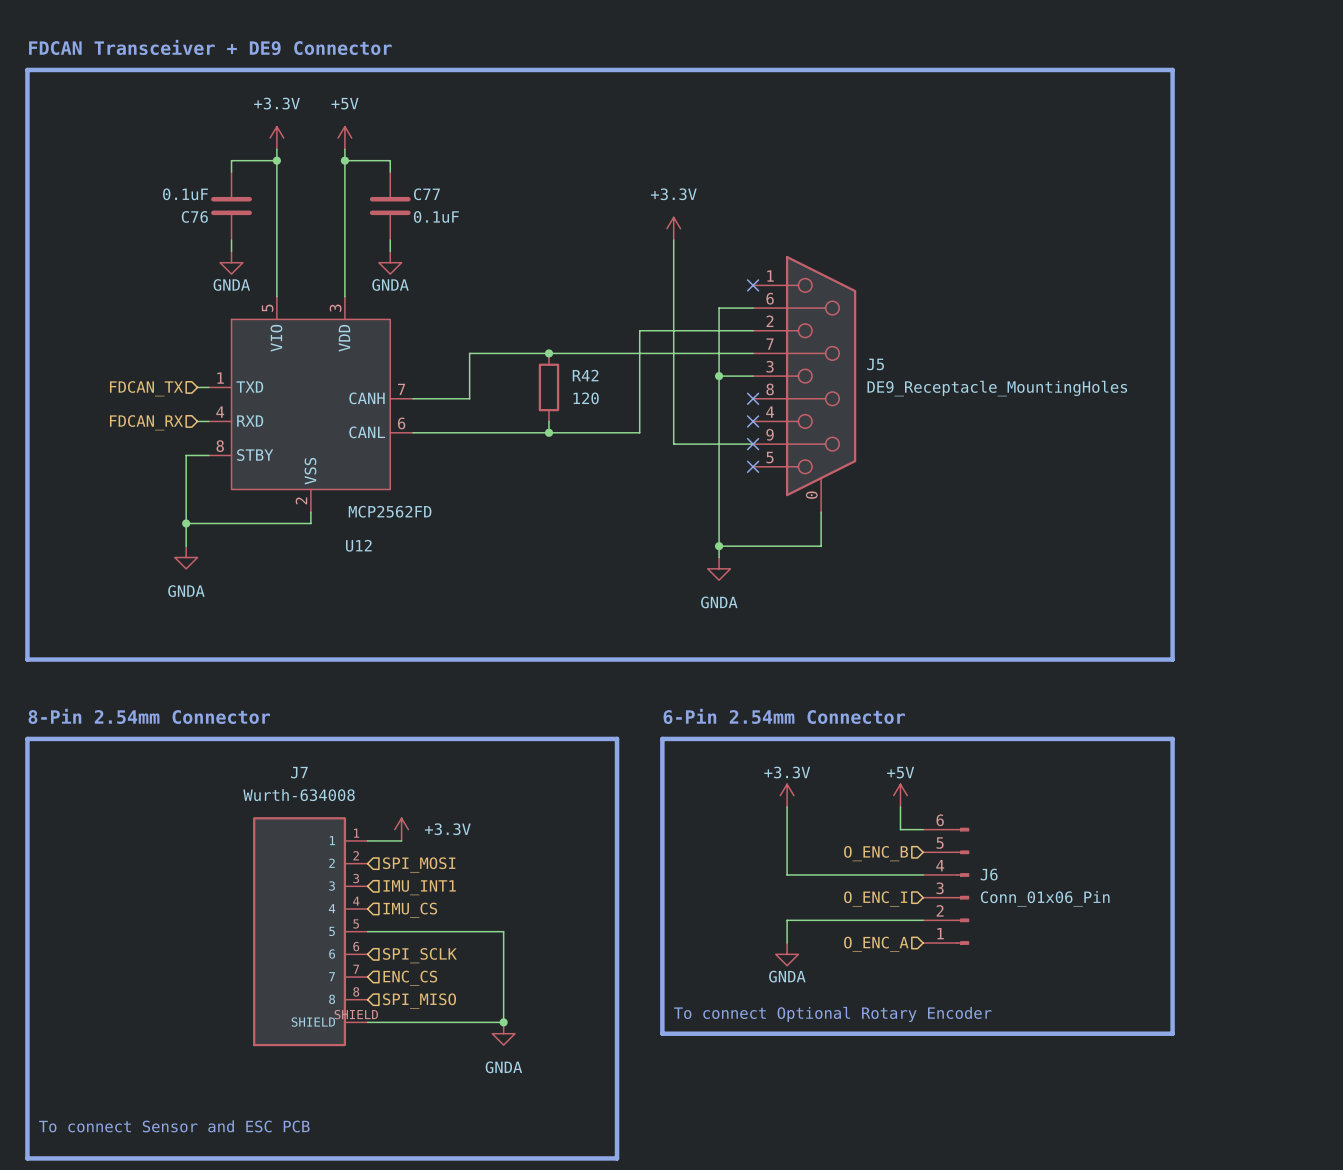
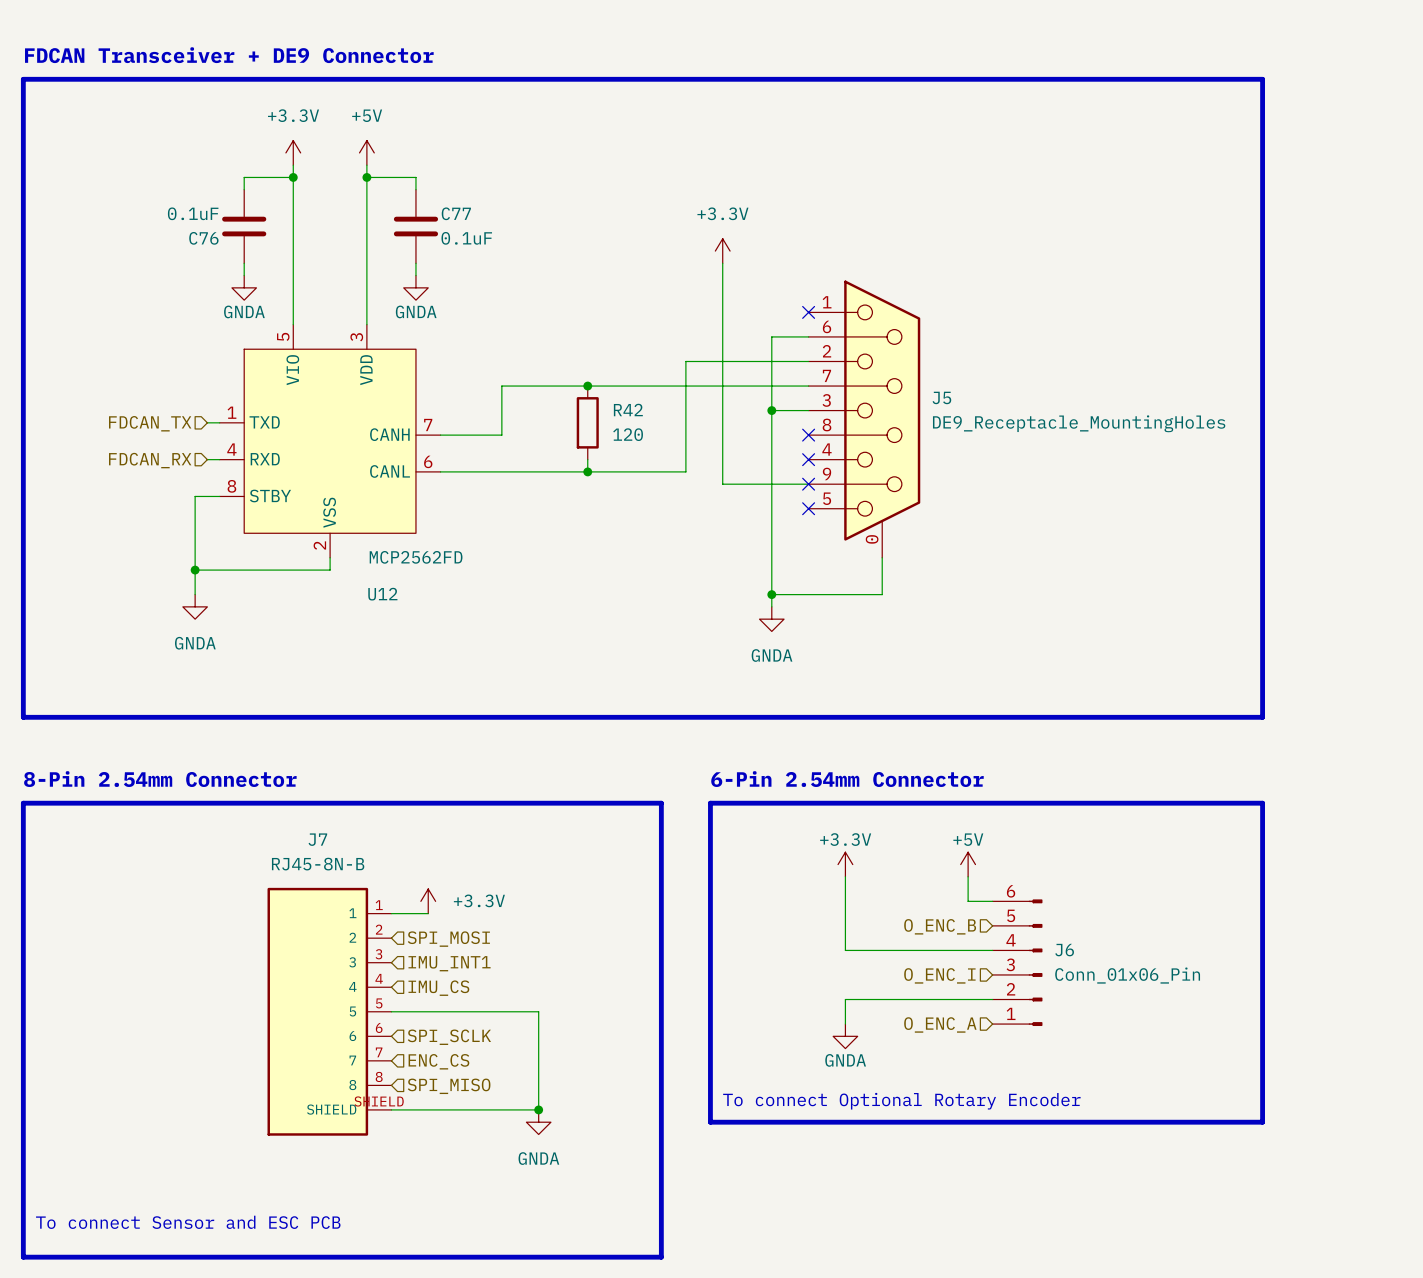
J7 value: Wurth-634008 (299, 795) -> RJ45-8N-B (318, 864)

